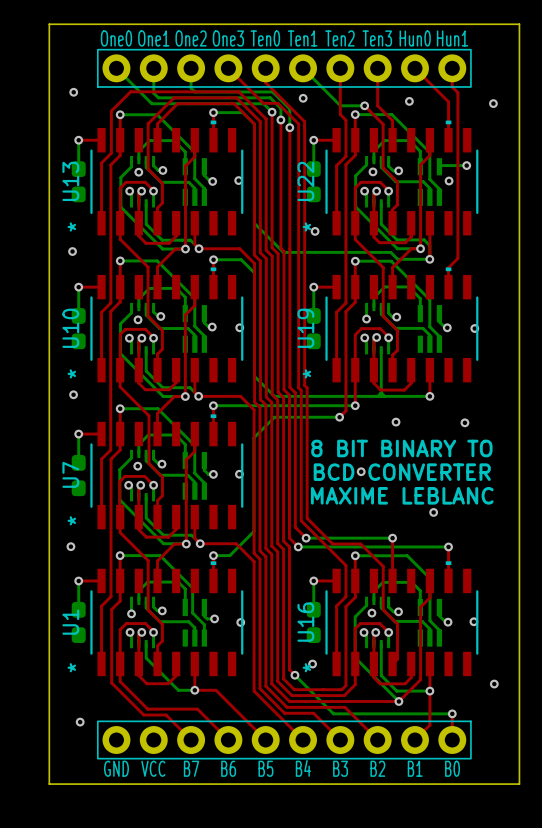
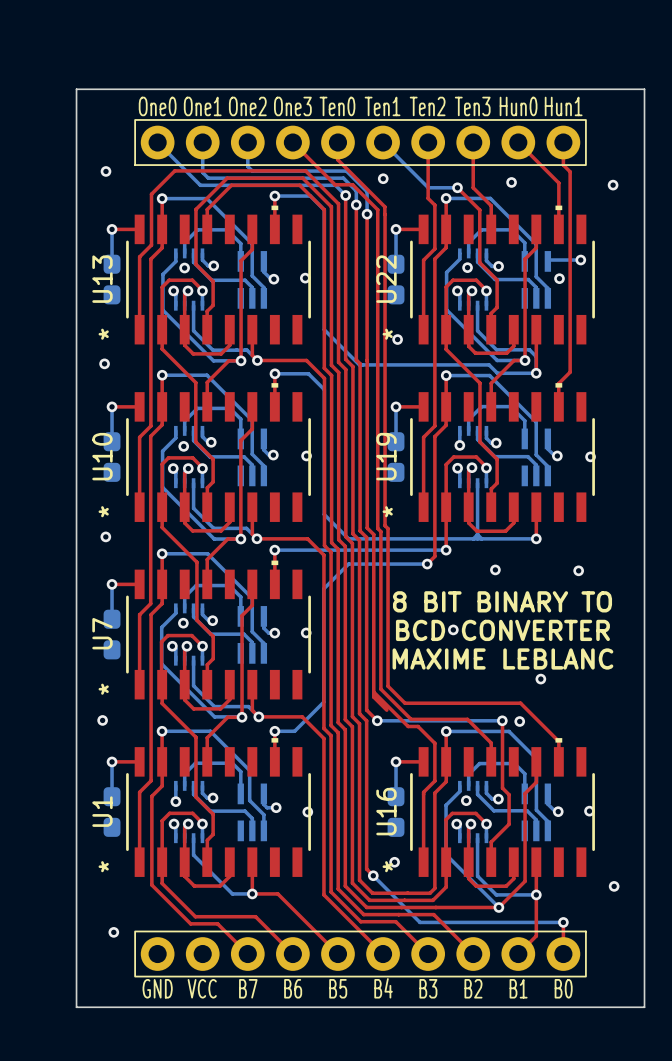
top track: (321, 532) (332, 544) (360, 544) (383, 566) (383, 609) (397, 624) (397, 659) (392, 663) -> (502, 720) (502, 788) (509, 794) (509, 824) (491, 842) (491, 862)
bottom track: (306, 538) (392, 538) -> none
via: (306, 538) -> none
top track: (392, 538) (392, 565) -> (411, 719) (467, 719) (491, 743)
via: (392, 538) -> none
top track: (326, 545) (345, 565) -> (373, 692) (408, 726) (418, 726) (434, 743)
bottom track: (401, 546) (448, 546) -> none
via: none -> (502, 720)
top track: (448, 546) (448, 564) -> (405, 703) (520, 703) (558, 741)
via: (448, 546) -> none
via: none -> (519, 721)

